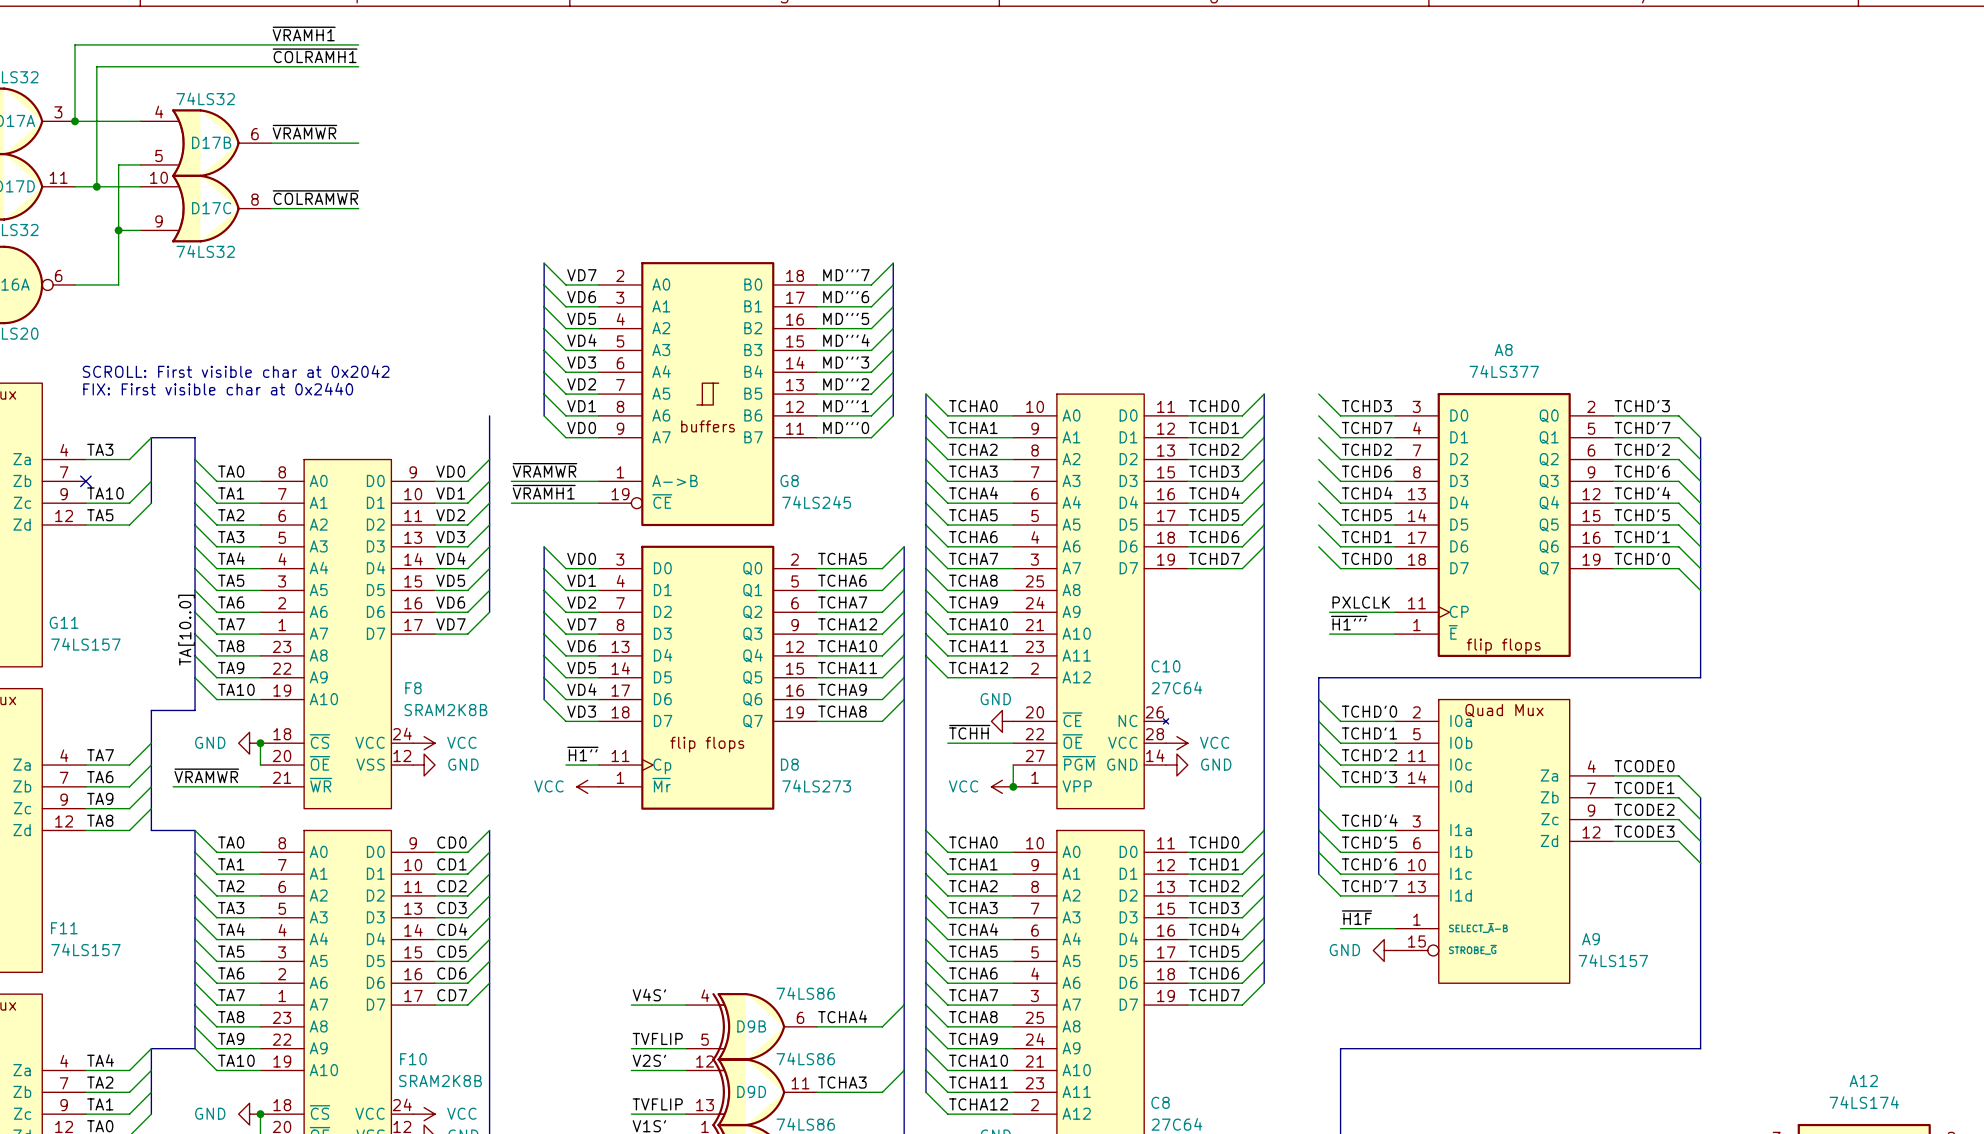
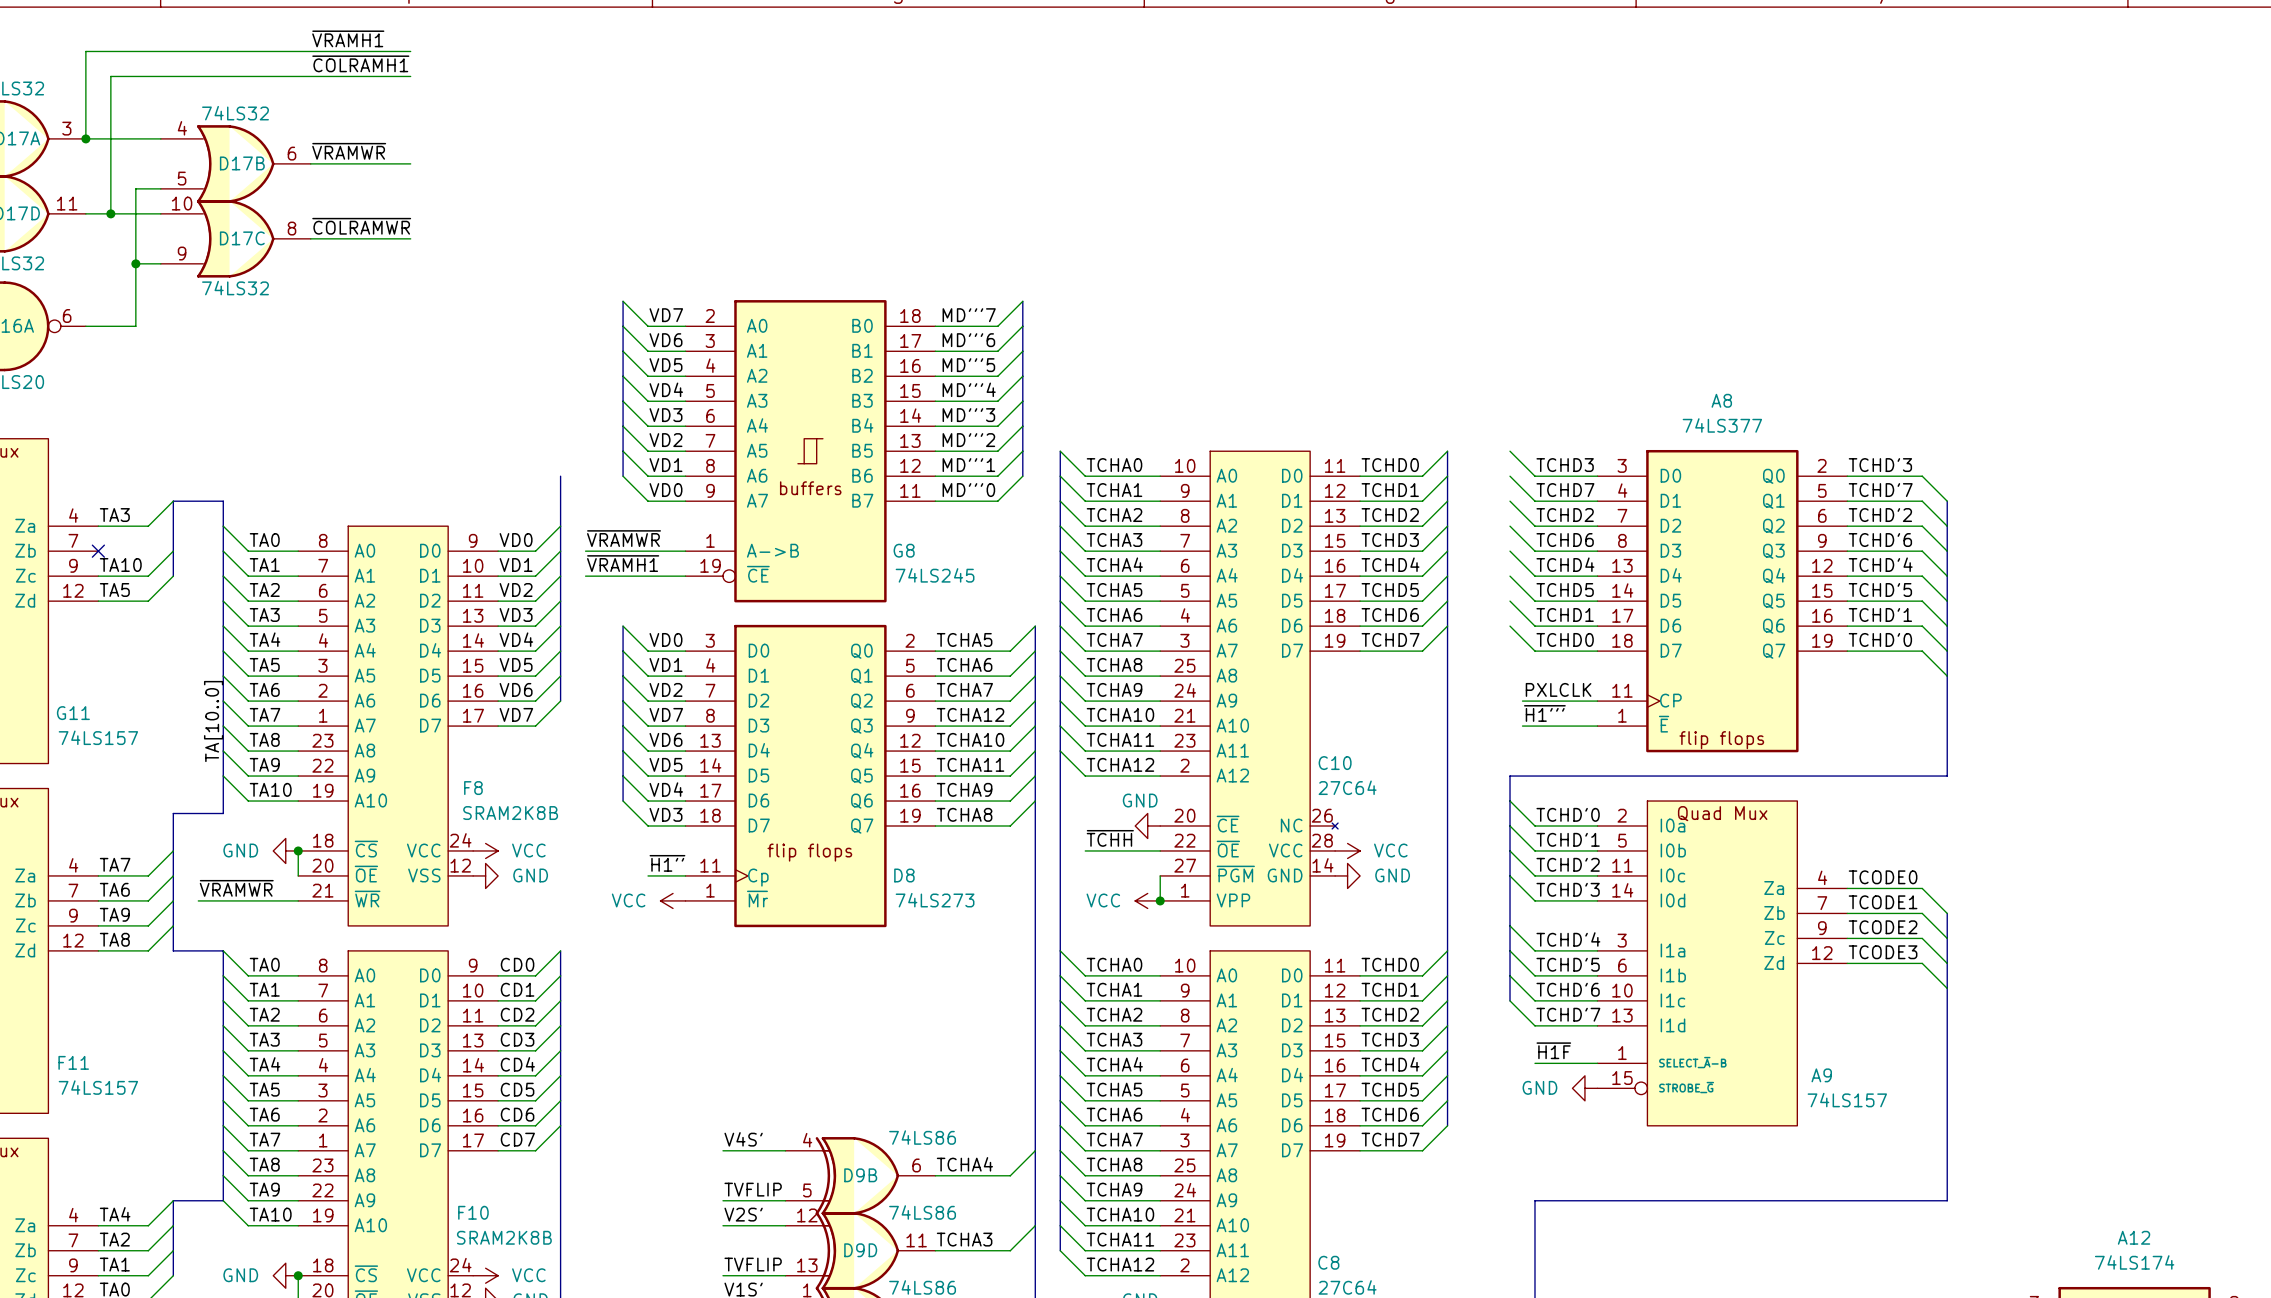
text: SCROLL: First visible char at 0x2042 (236, 371) -> none
text: FIX: First visible char at 0x2440 (218, 389) -> none

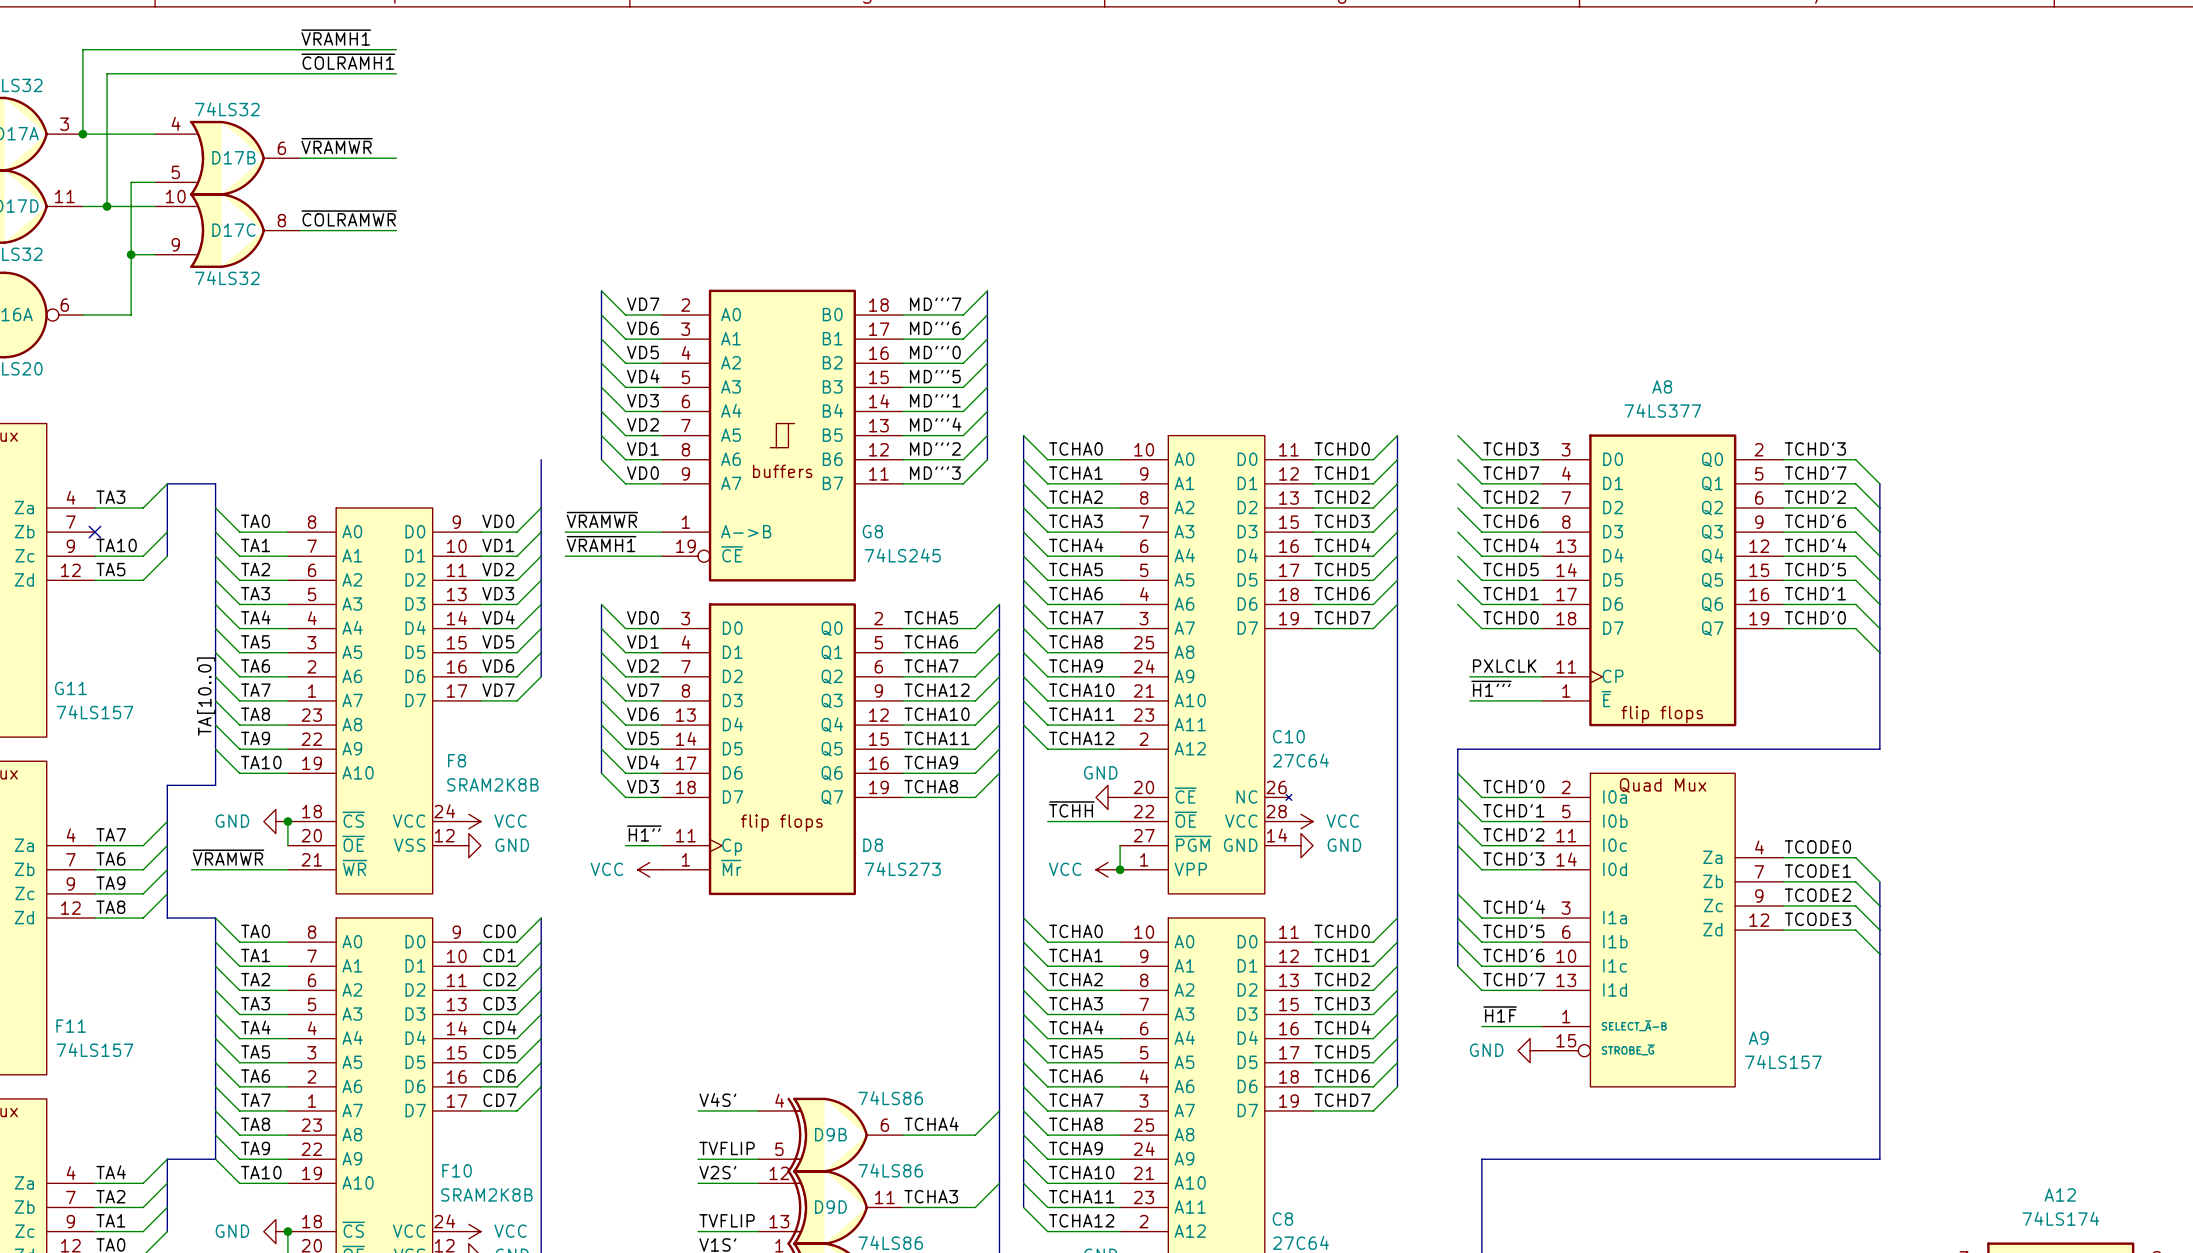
label: MD'''5 (968, 365) -> MD'''0 (935, 352)
label: MD'''4 (969, 389) -> MD'''5 (935, 376)
label: MD'''3 (968, 415) -> MD'''1 (935, 400)
label: MD'''2 (968, 440) -> MD'''4 (935, 424)
label: MD'''1 (968, 465) -> MD'''2 (935, 448)
label: MD'''0 (968, 490) -> MD'''3 (935, 473)

